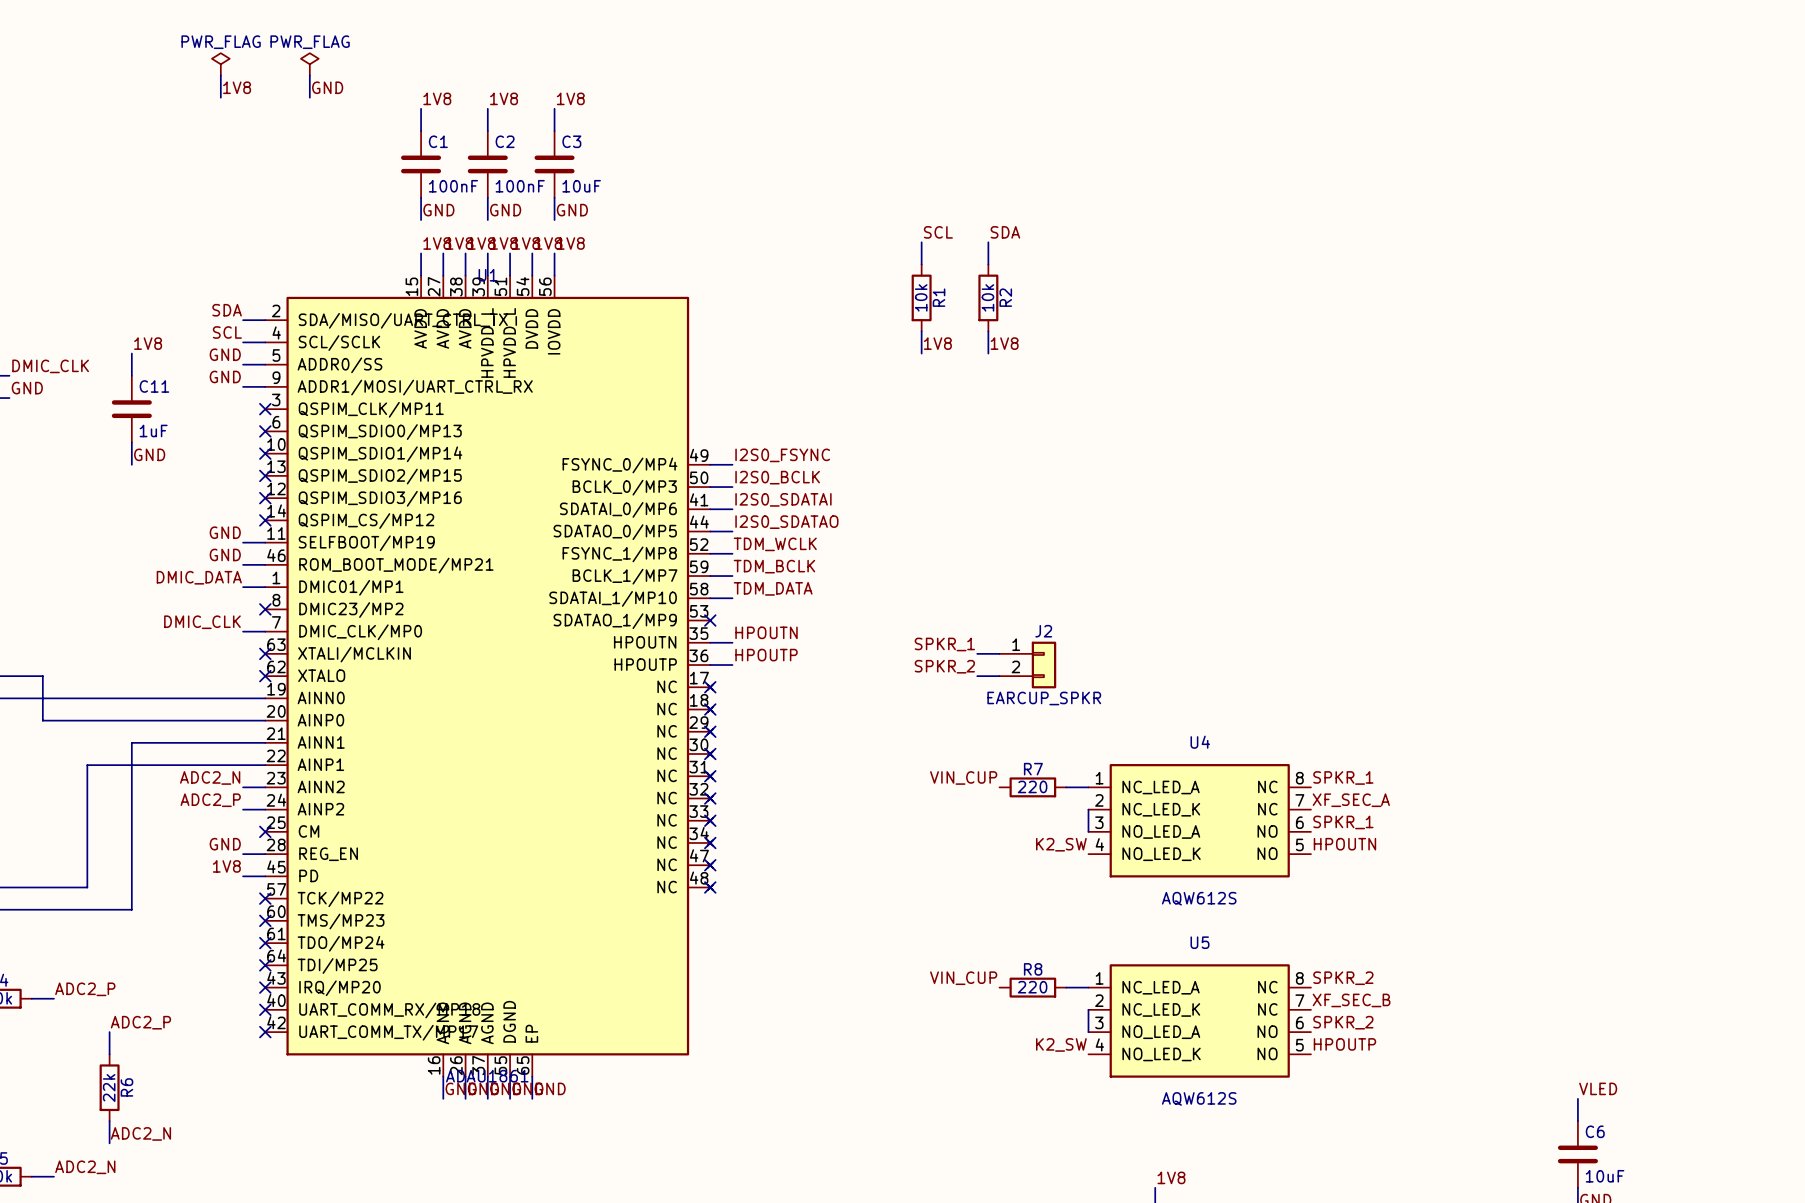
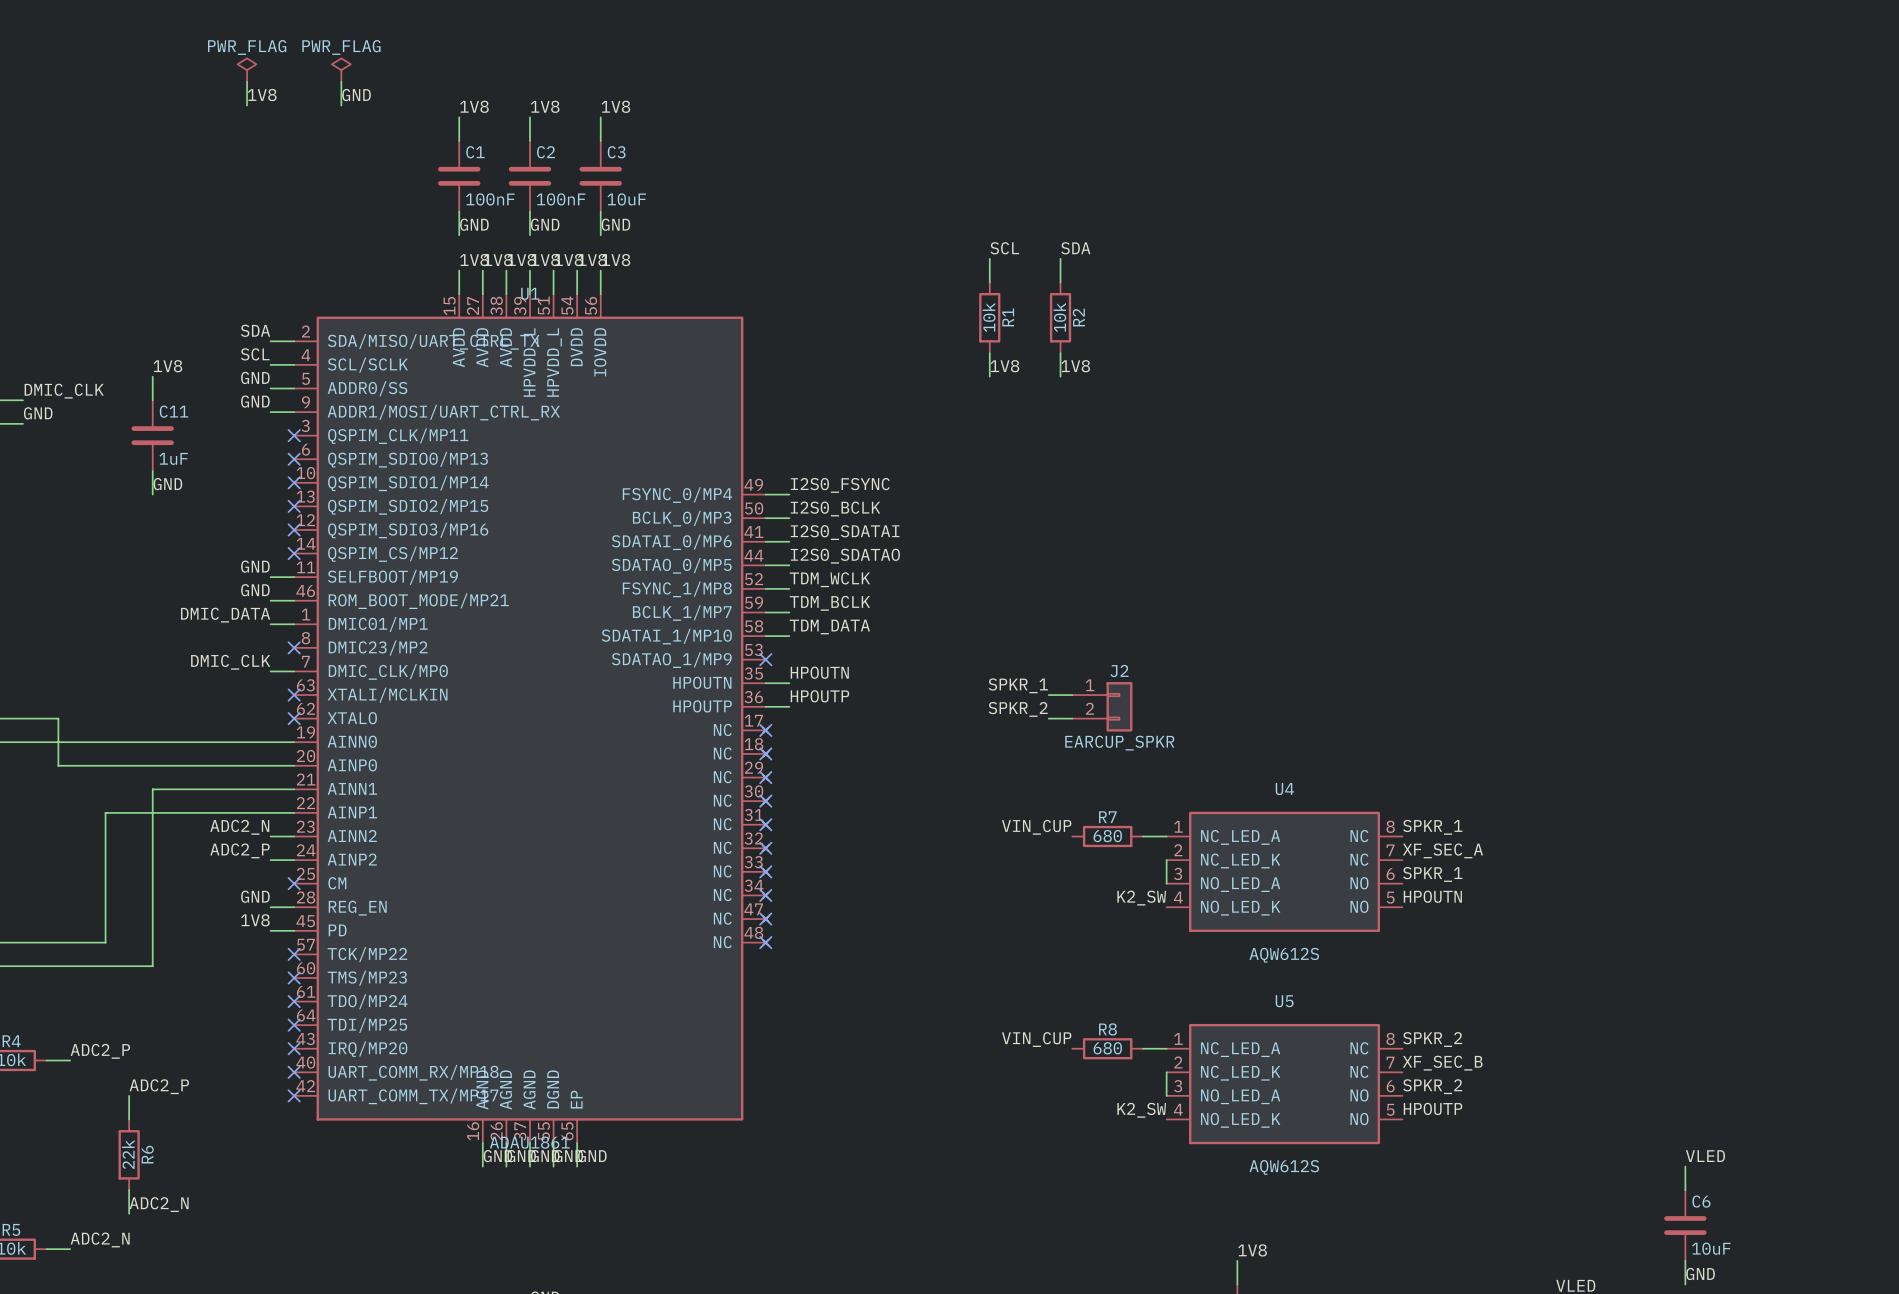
R7 value: 220 (1032, 786) -> 680 (1107, 836)
R8 value: 220 (1032, 987) -> 680 (1107, 1048)

